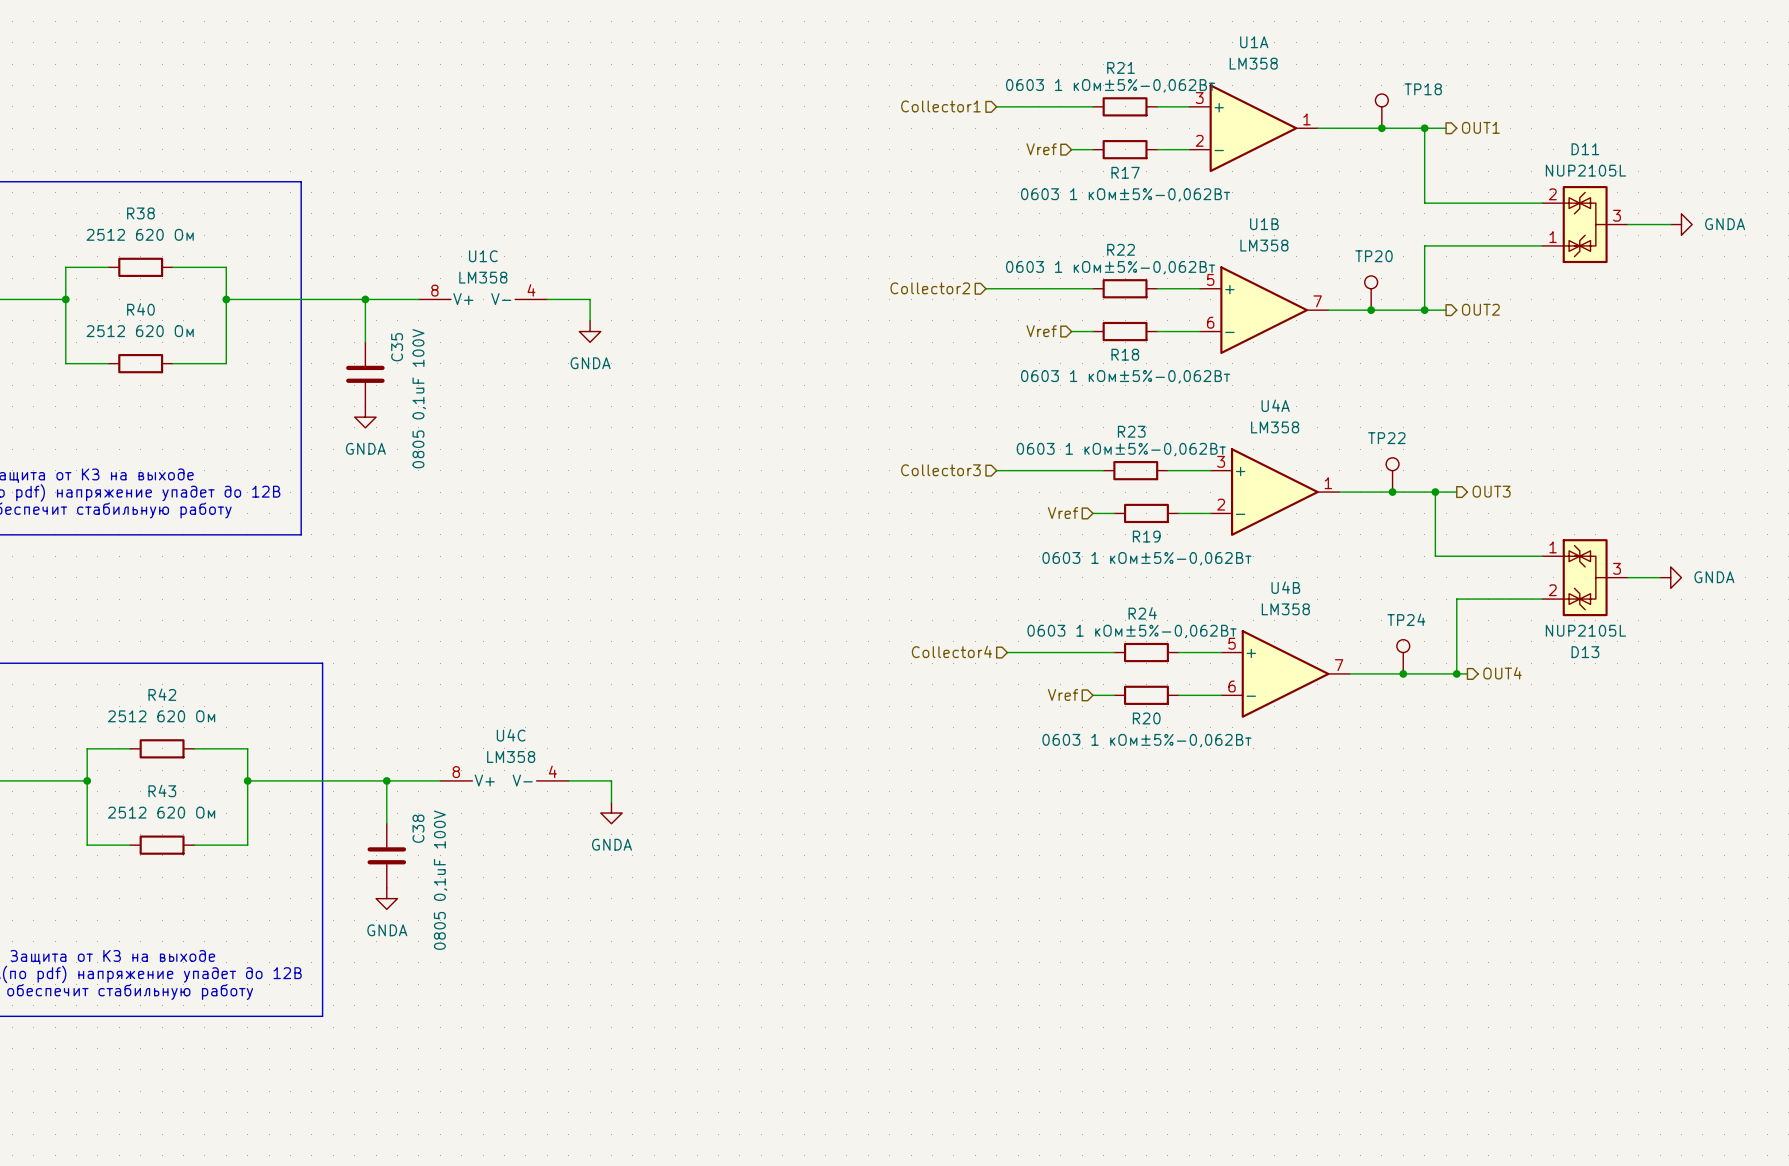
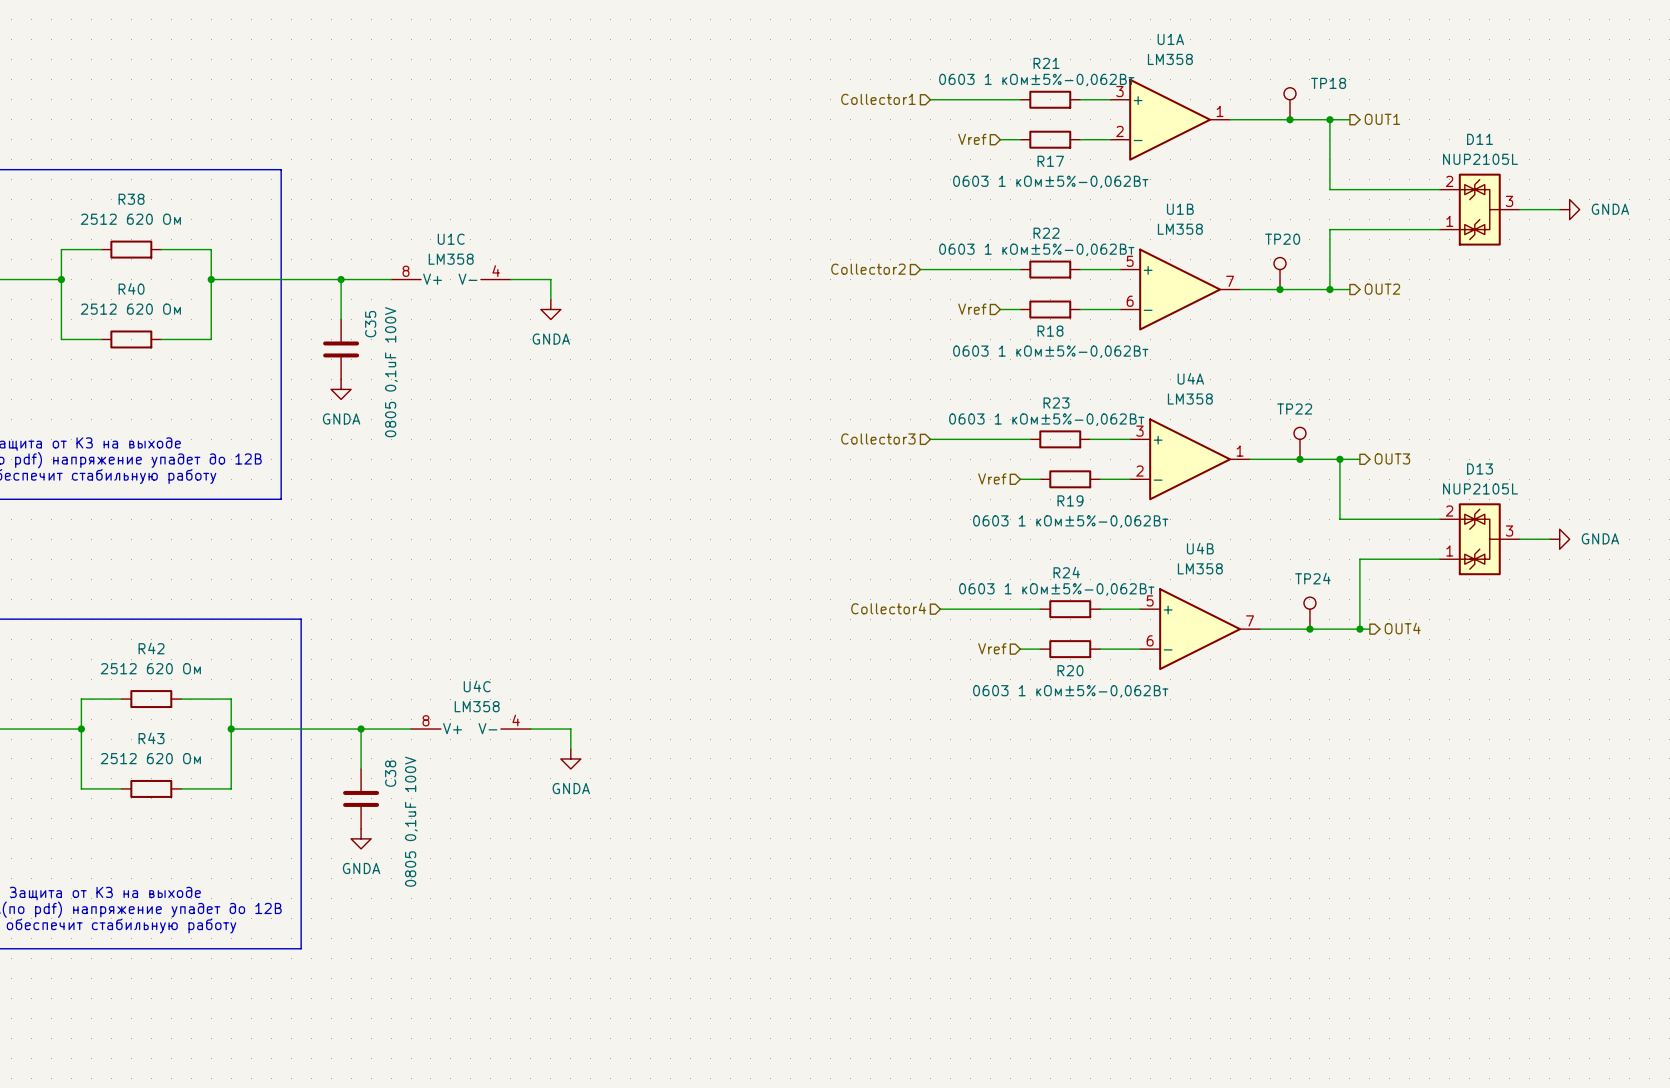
D13 flip: as is (1585, 577) -> up-down (1479, 539)

